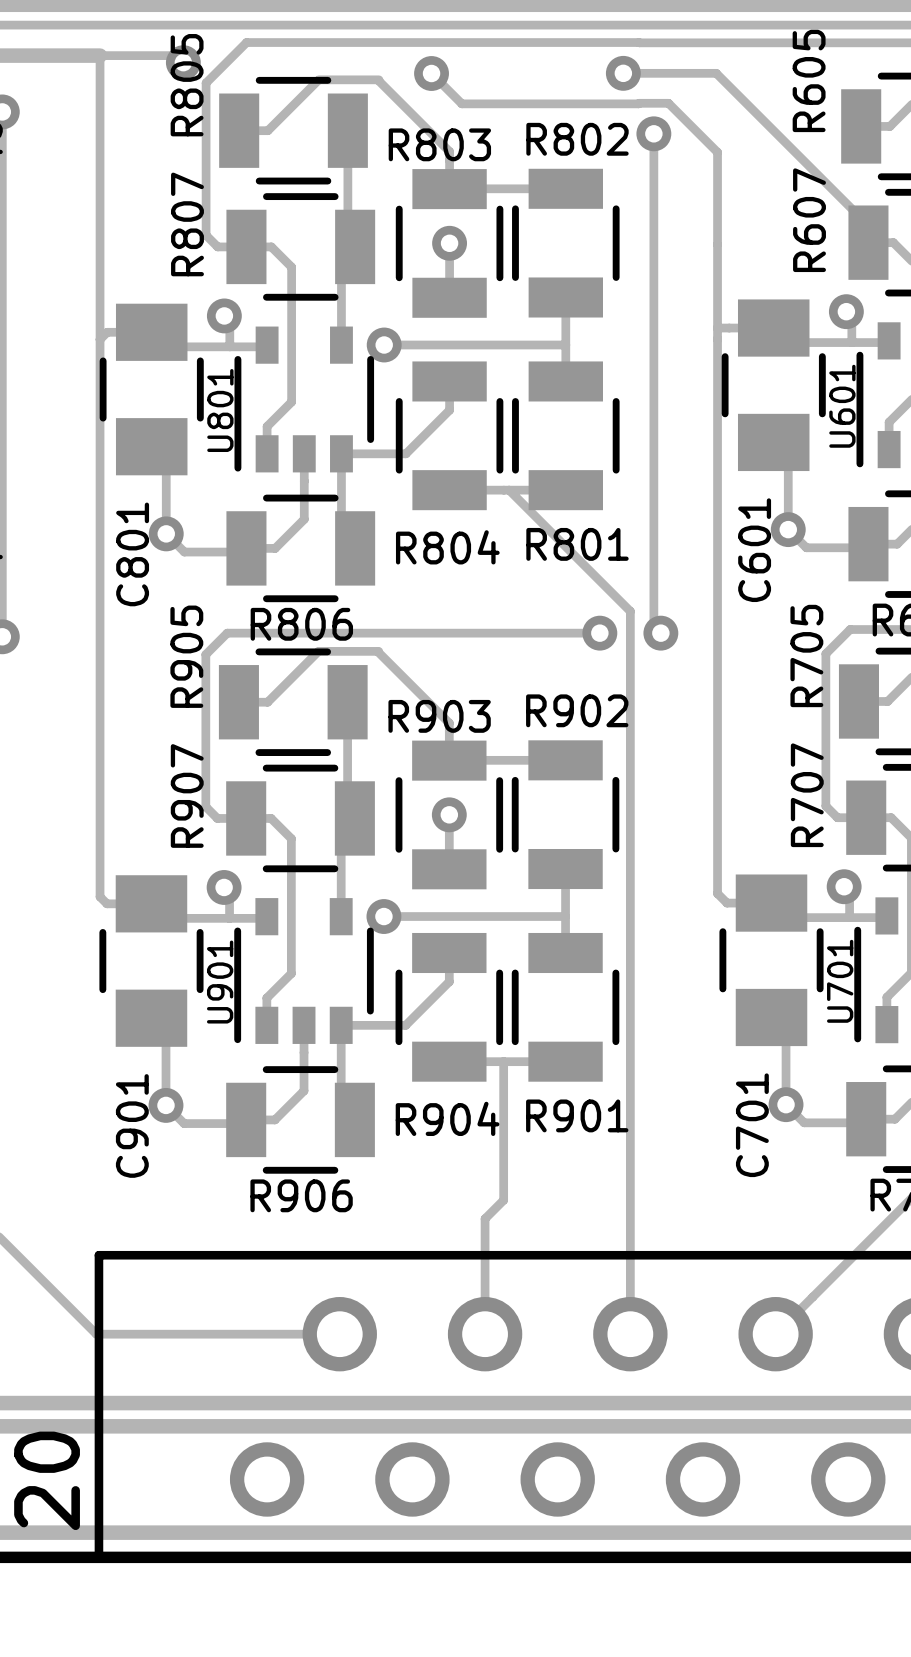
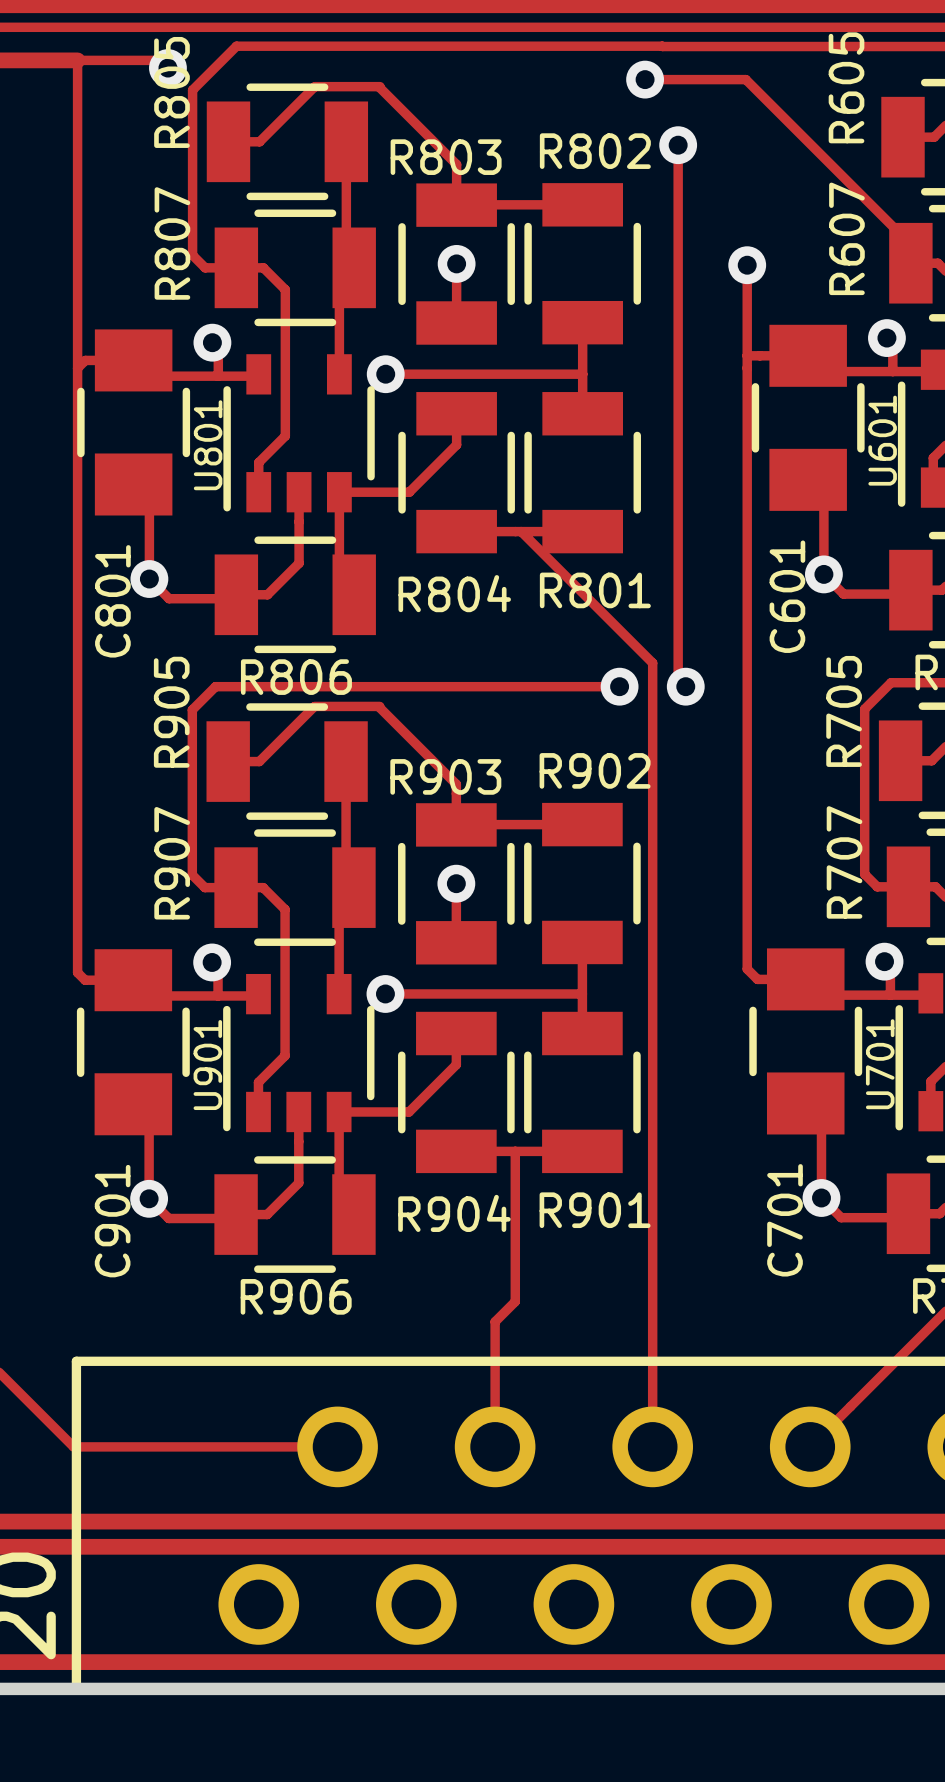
track: (431, 73) (461, 103) (638, 103) -> none
via: (431, 73) -> none
track: (639, 103) (668, 103) (717, 152) (717, 244) -> none
via: none -> (747, 265)

